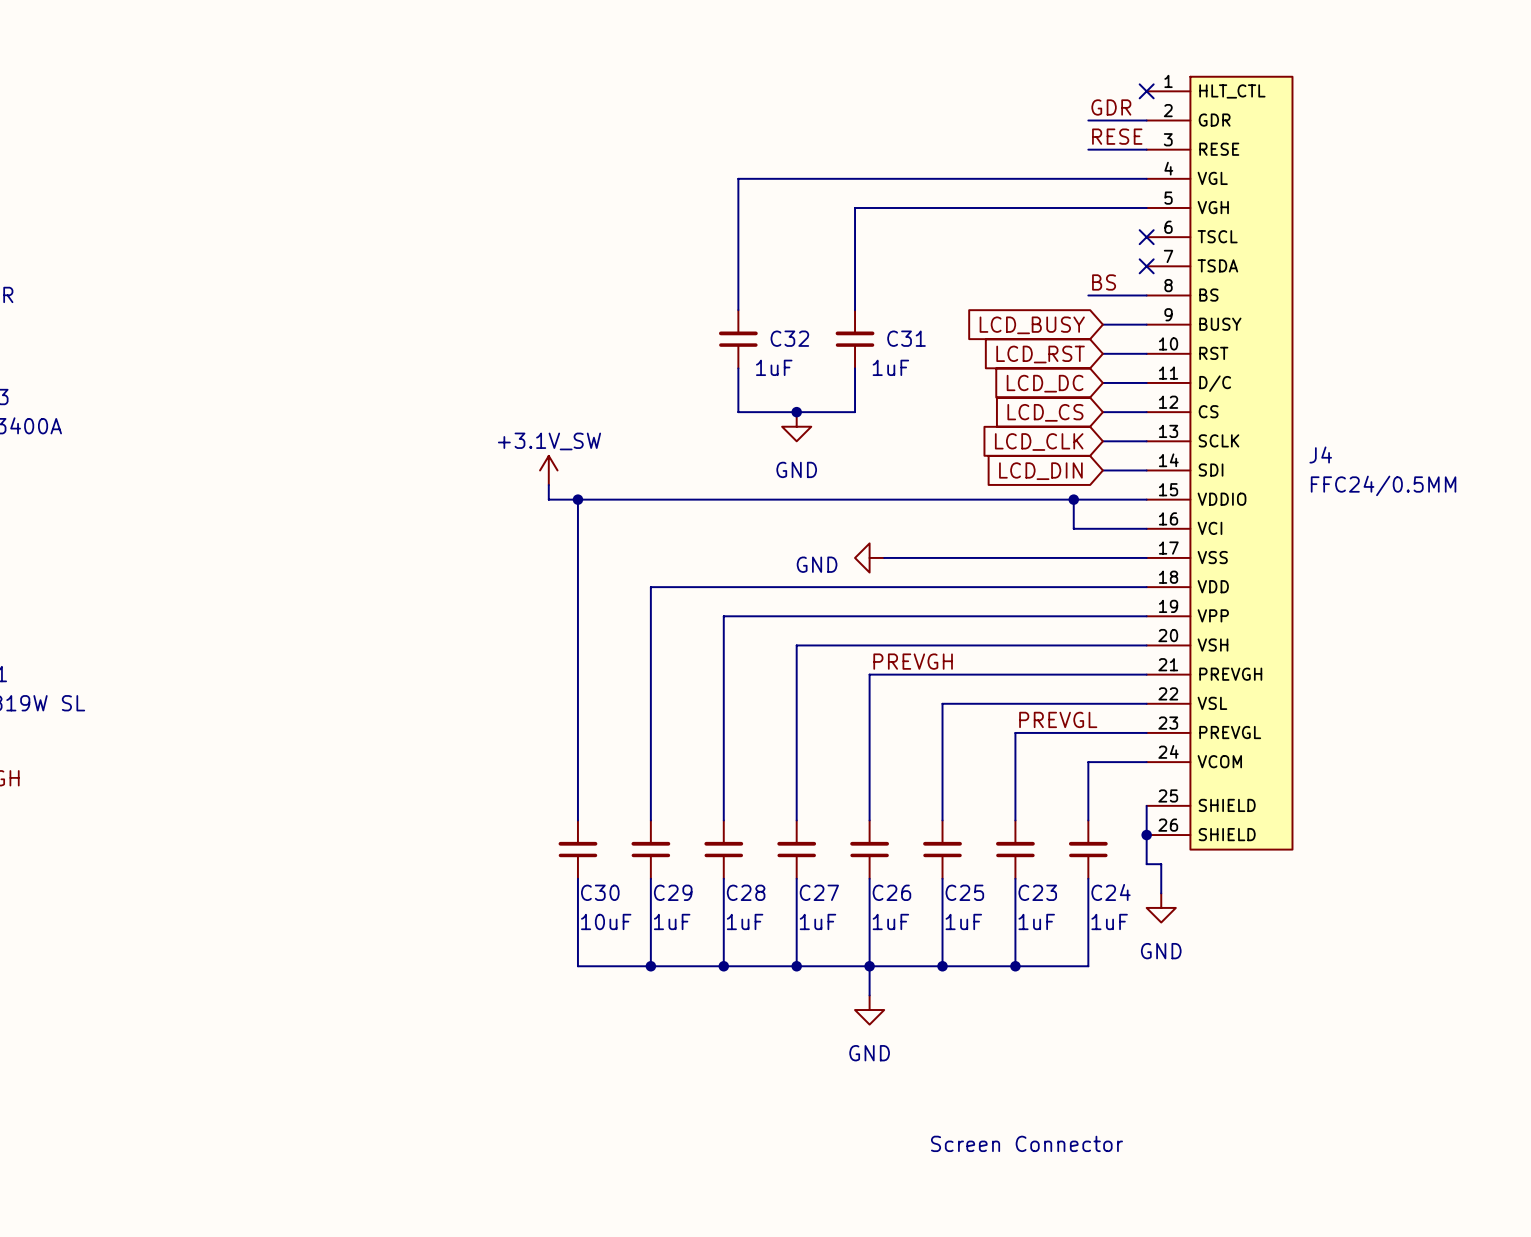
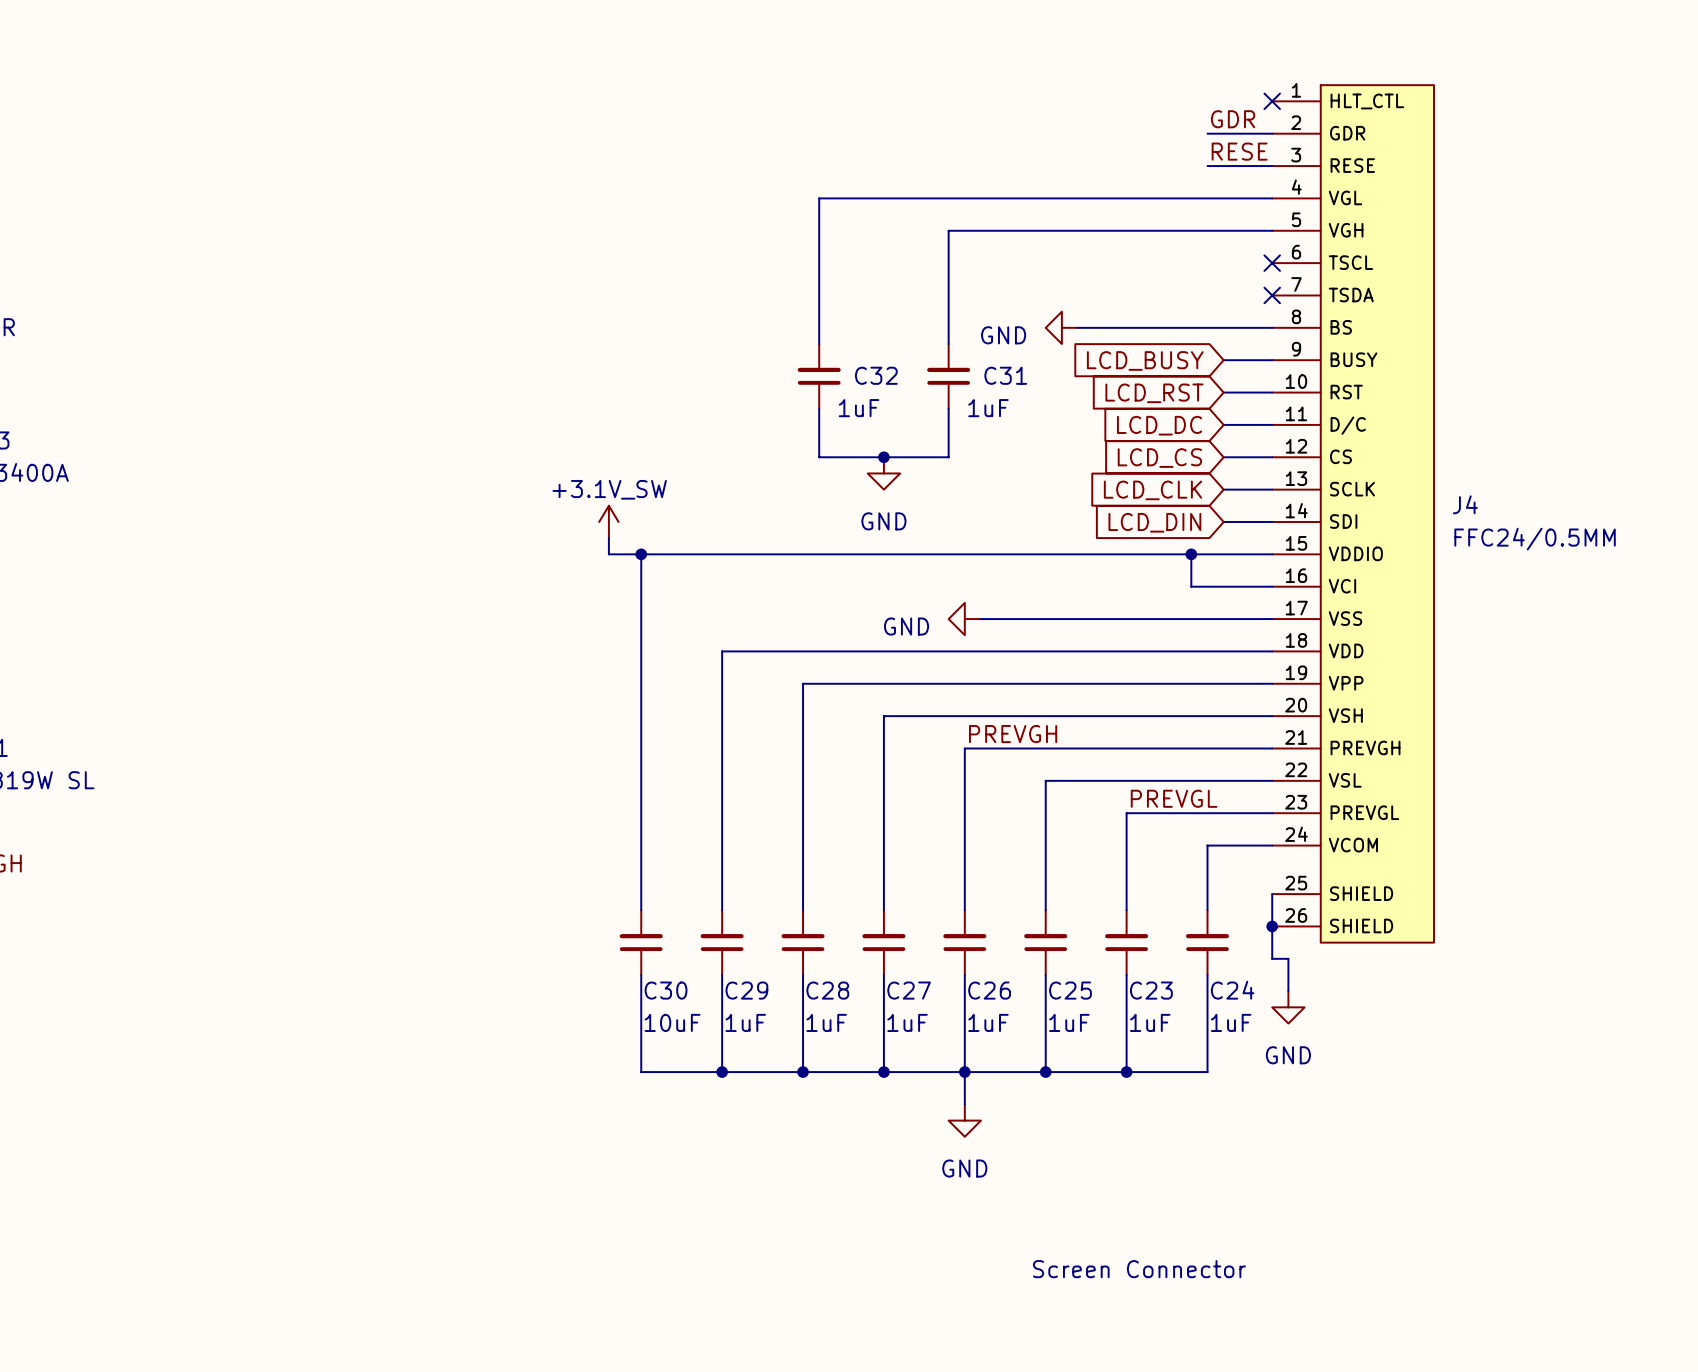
label: BS (1104, 282) -> none
power symbol: none -> GND (1061, 327)
wire: none -> (1078, 327) (1207, 327)

